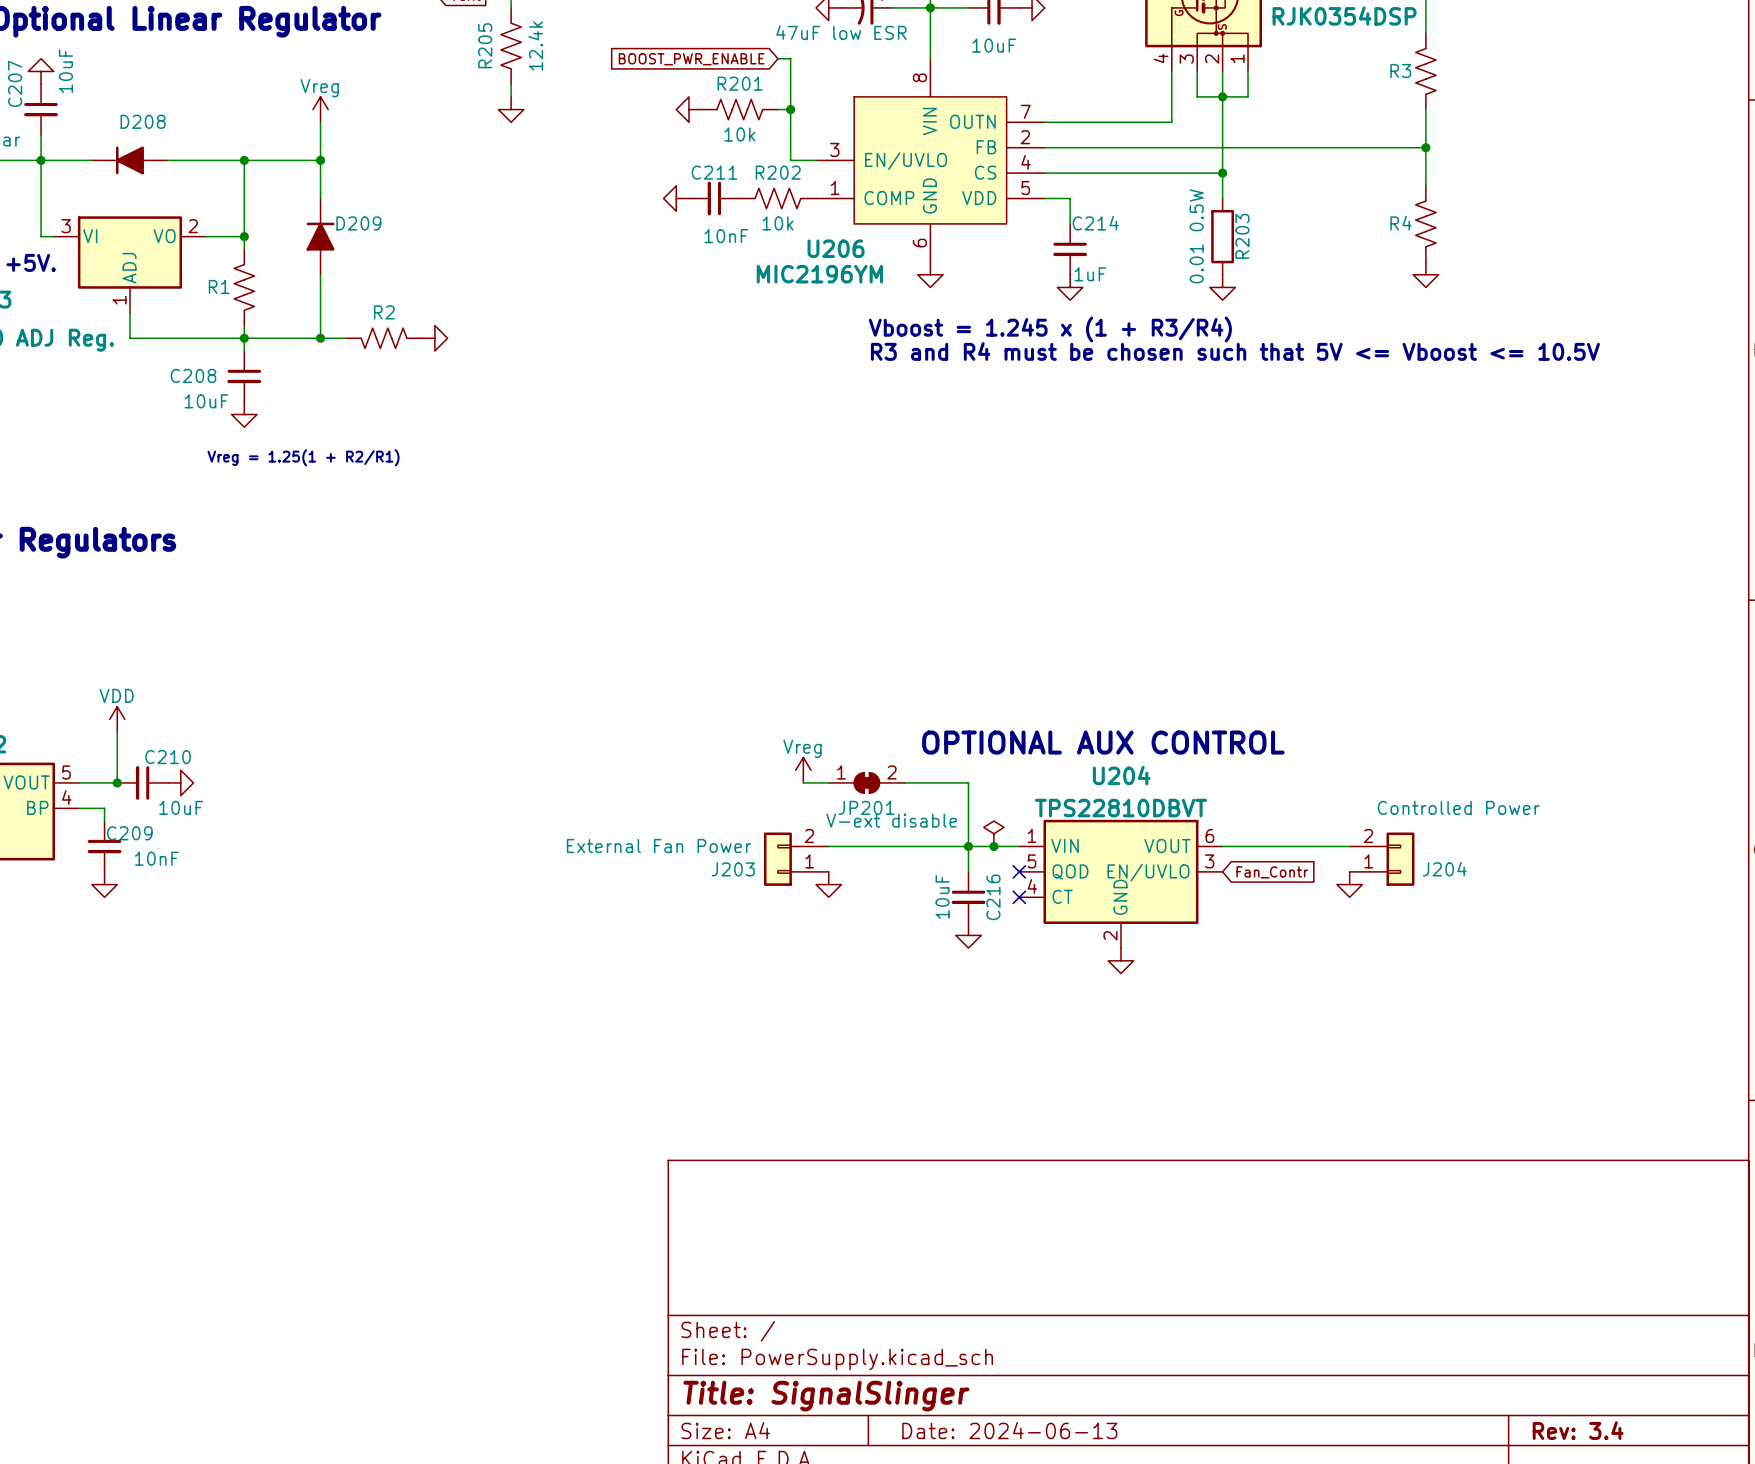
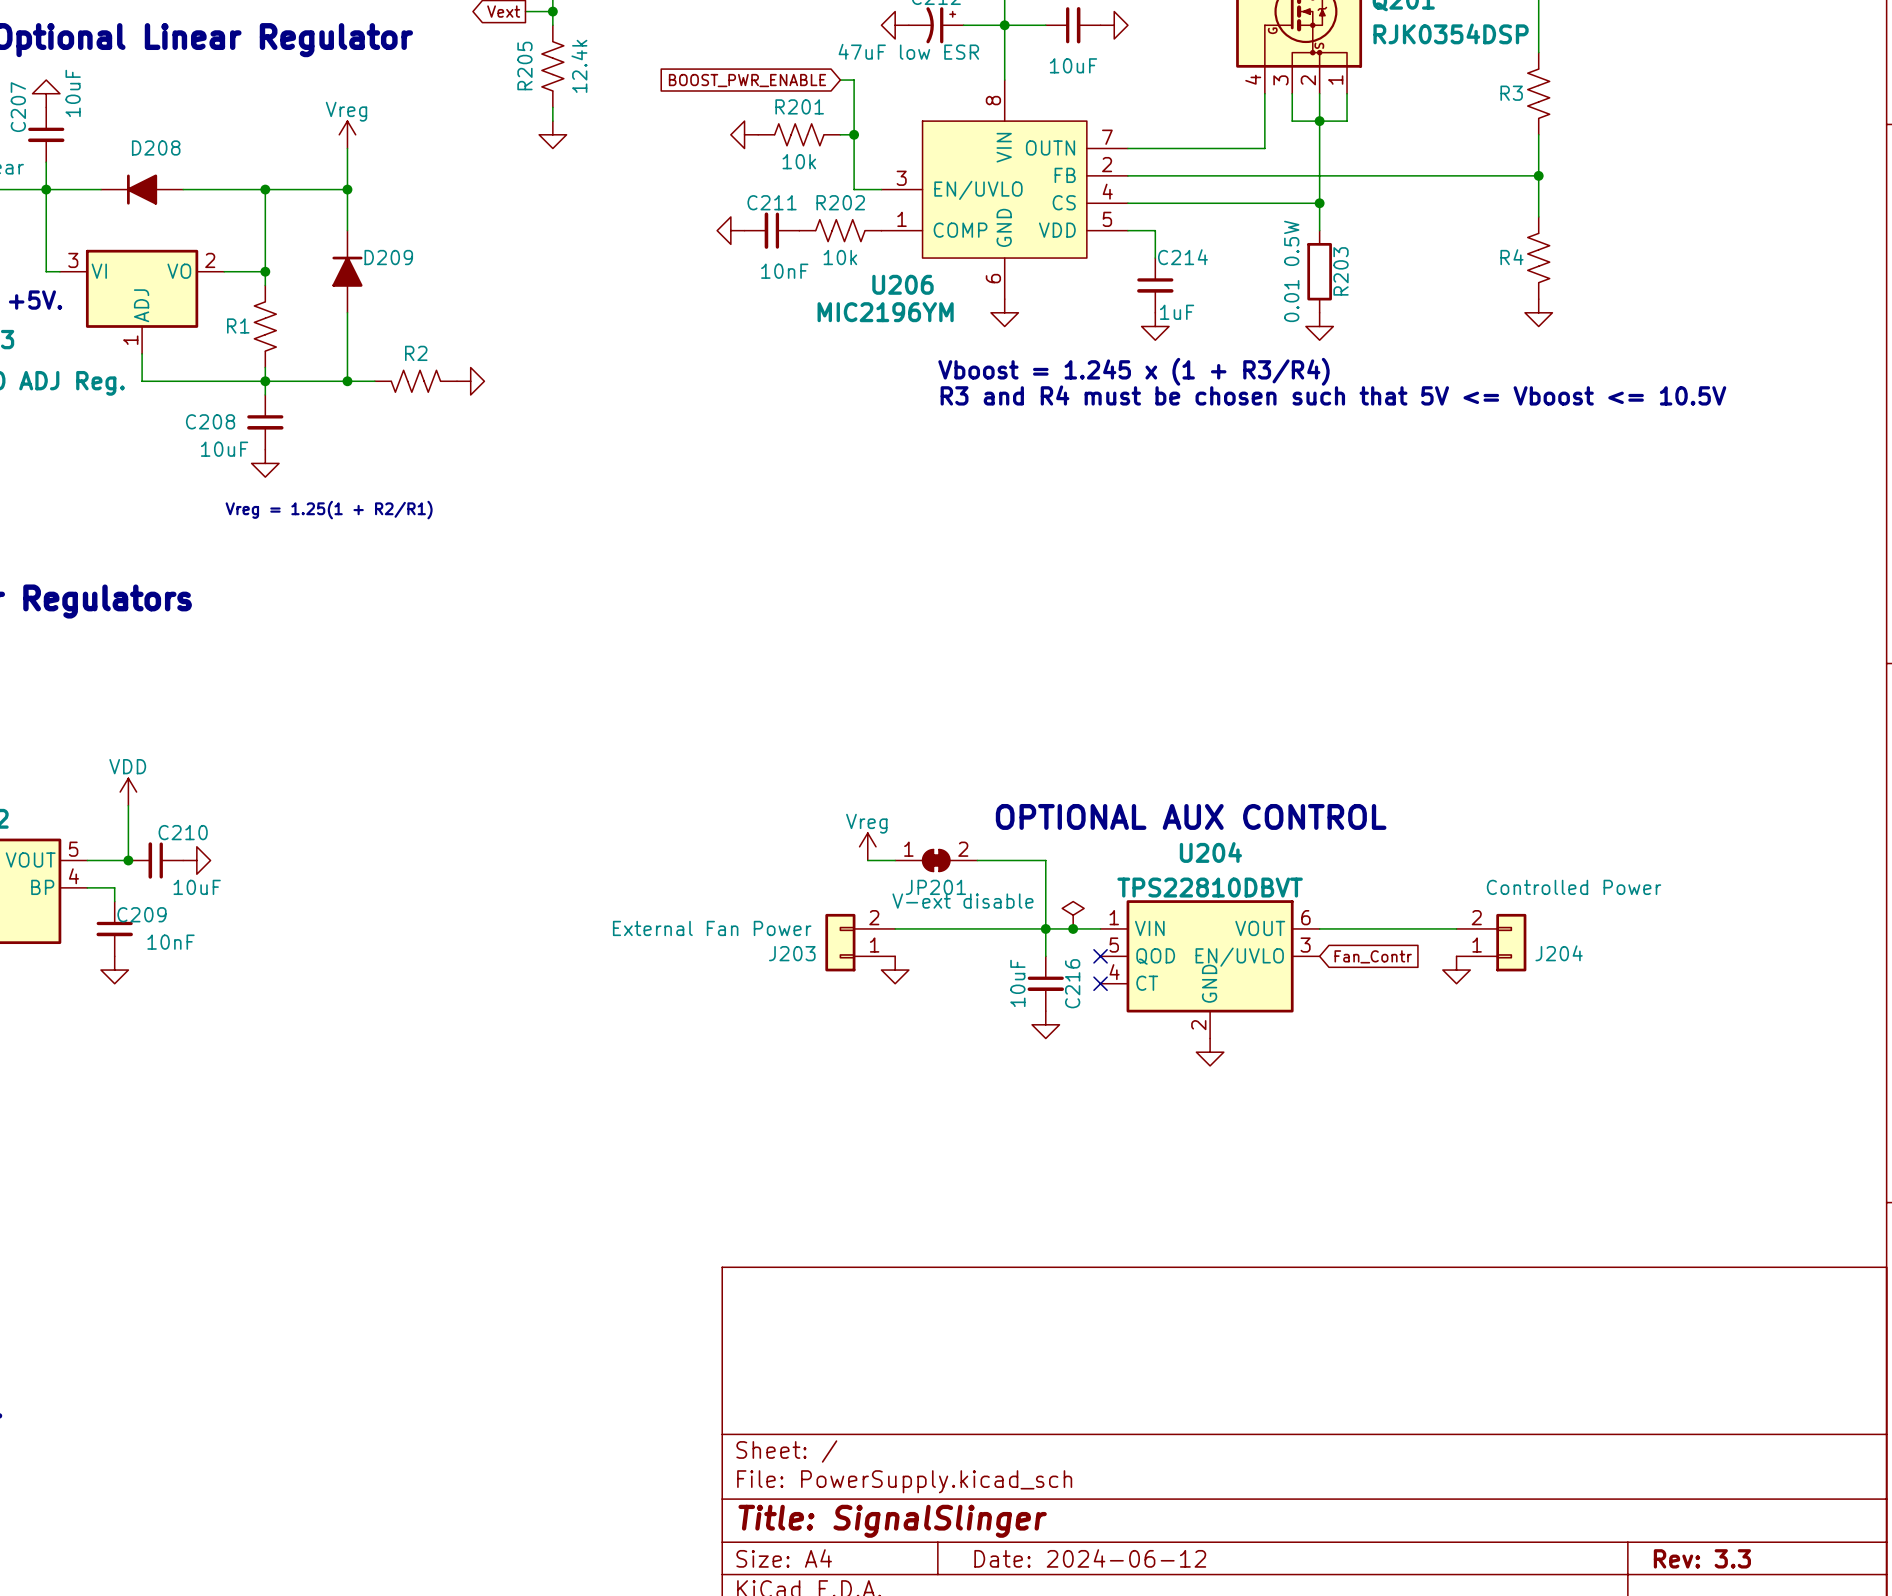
title block: Date: 2024-06-13 (1009, 1430) -> Date: 2024-06-12 (1090, 1558)
title block: Rev: 3.4 (1578, 1430) -> Rev: 3.3 (1702, 1558)

